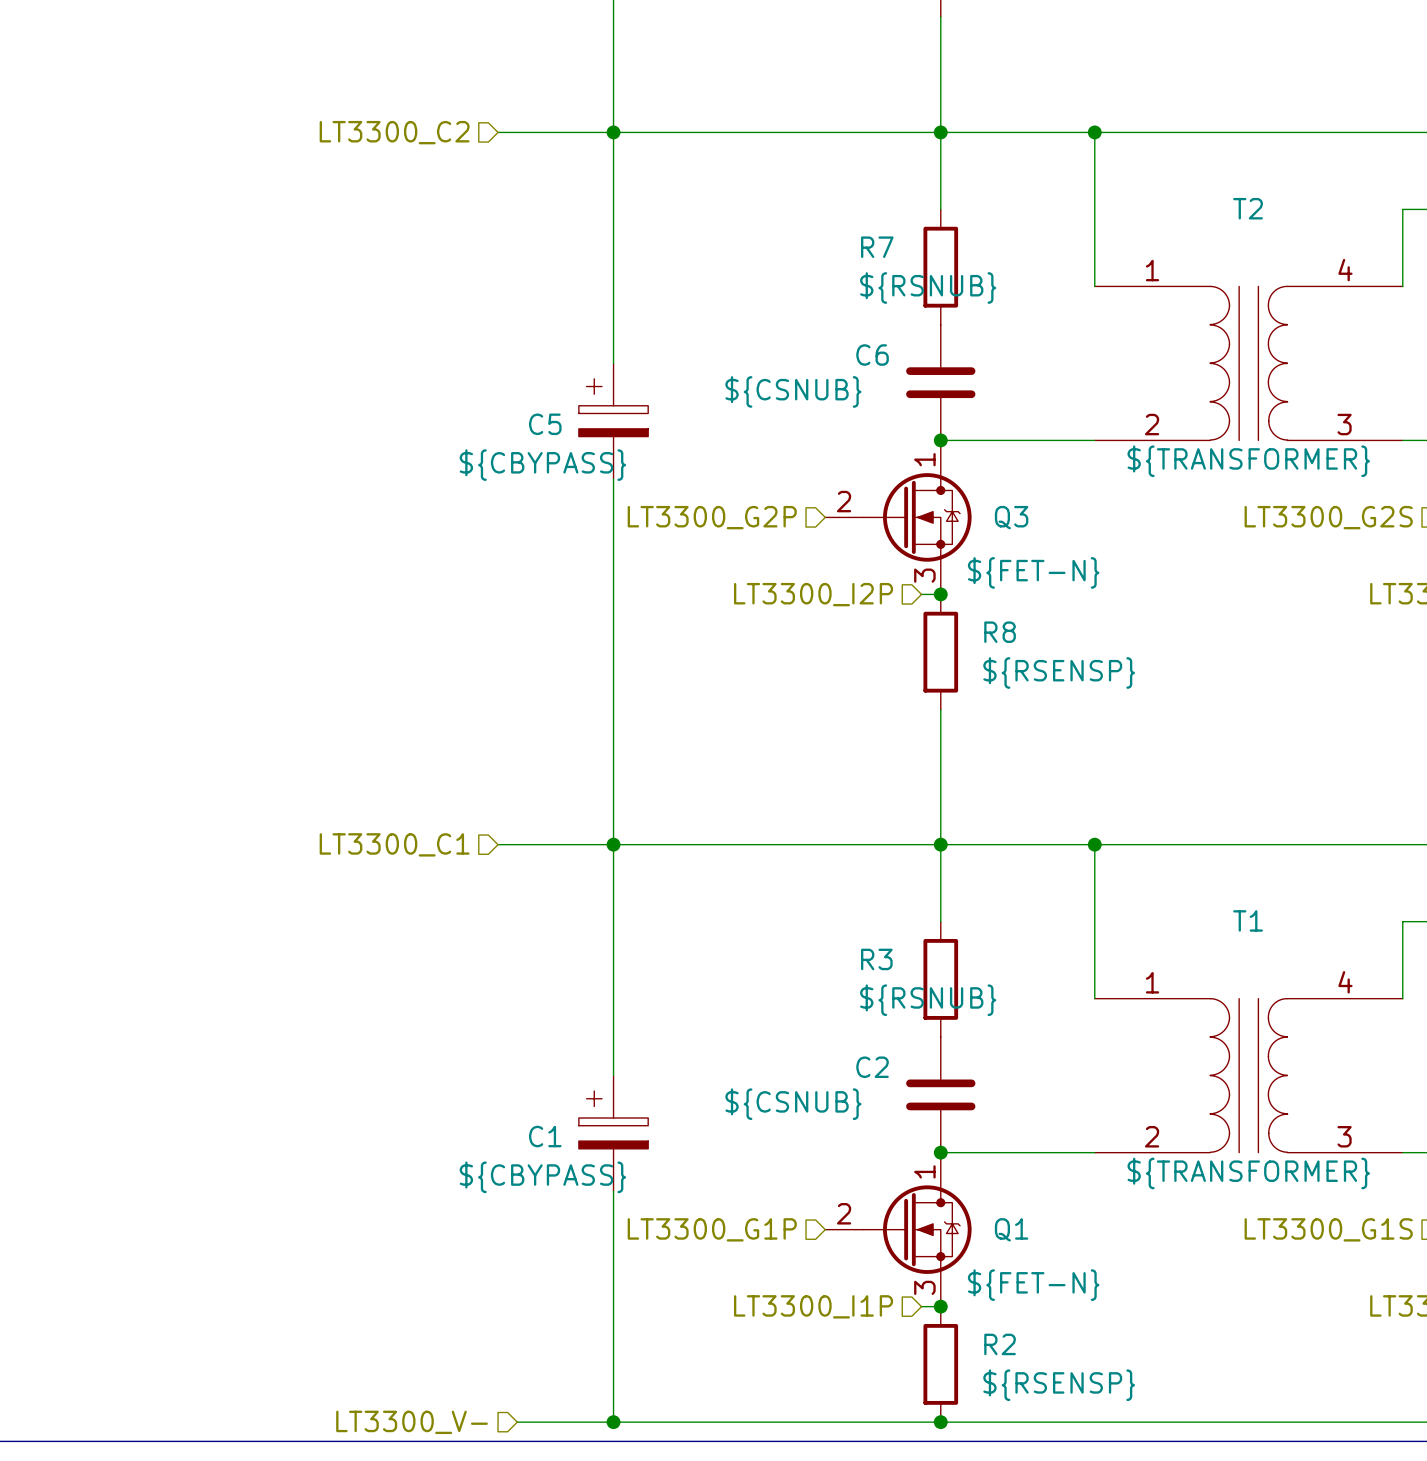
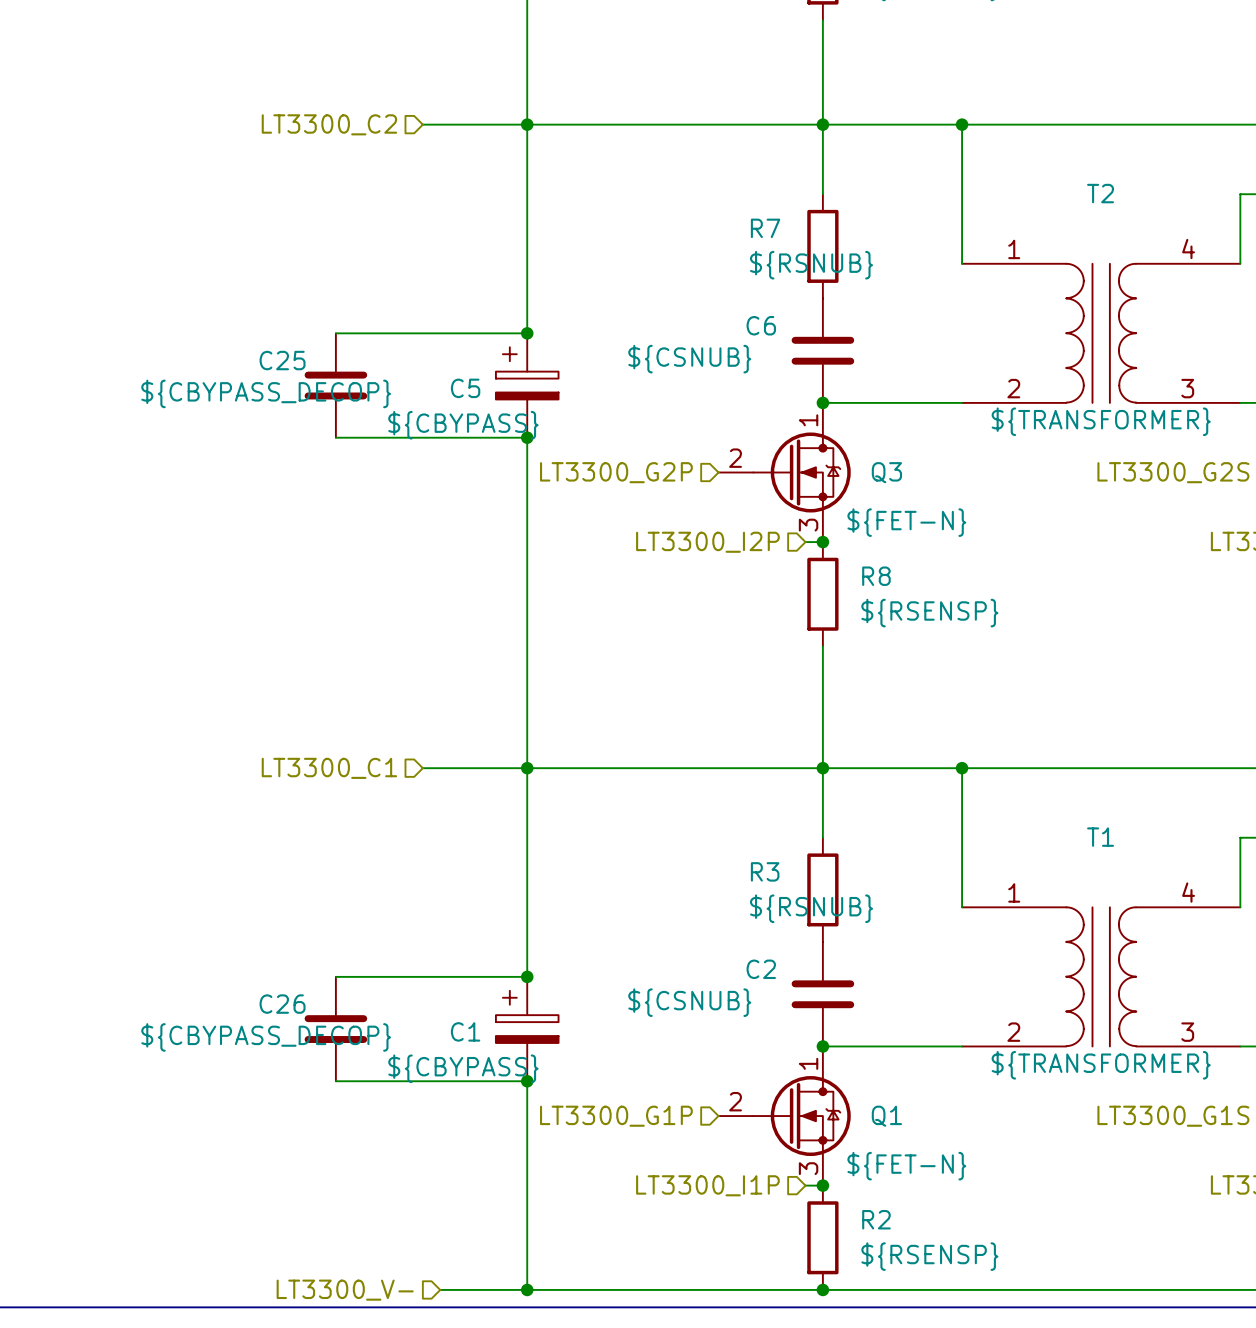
wire: none -> (335, 333) (527, 333)
junction: none -> (527, 333)
C25: none -> ${CBYPASS_DECOP} (335, 385)
wire: none -> (335, 437) (527, 437)
junction: none -> (527, 437)
wire: none -> (335, 976) (527, 976)
junction: none -> (527, 976)
C26: none -> ${CBYPASS_DECOP} (335, 1029)
wire: none -> (335, 1081) (527, 1081)
junction: none -> (527, 1081)

